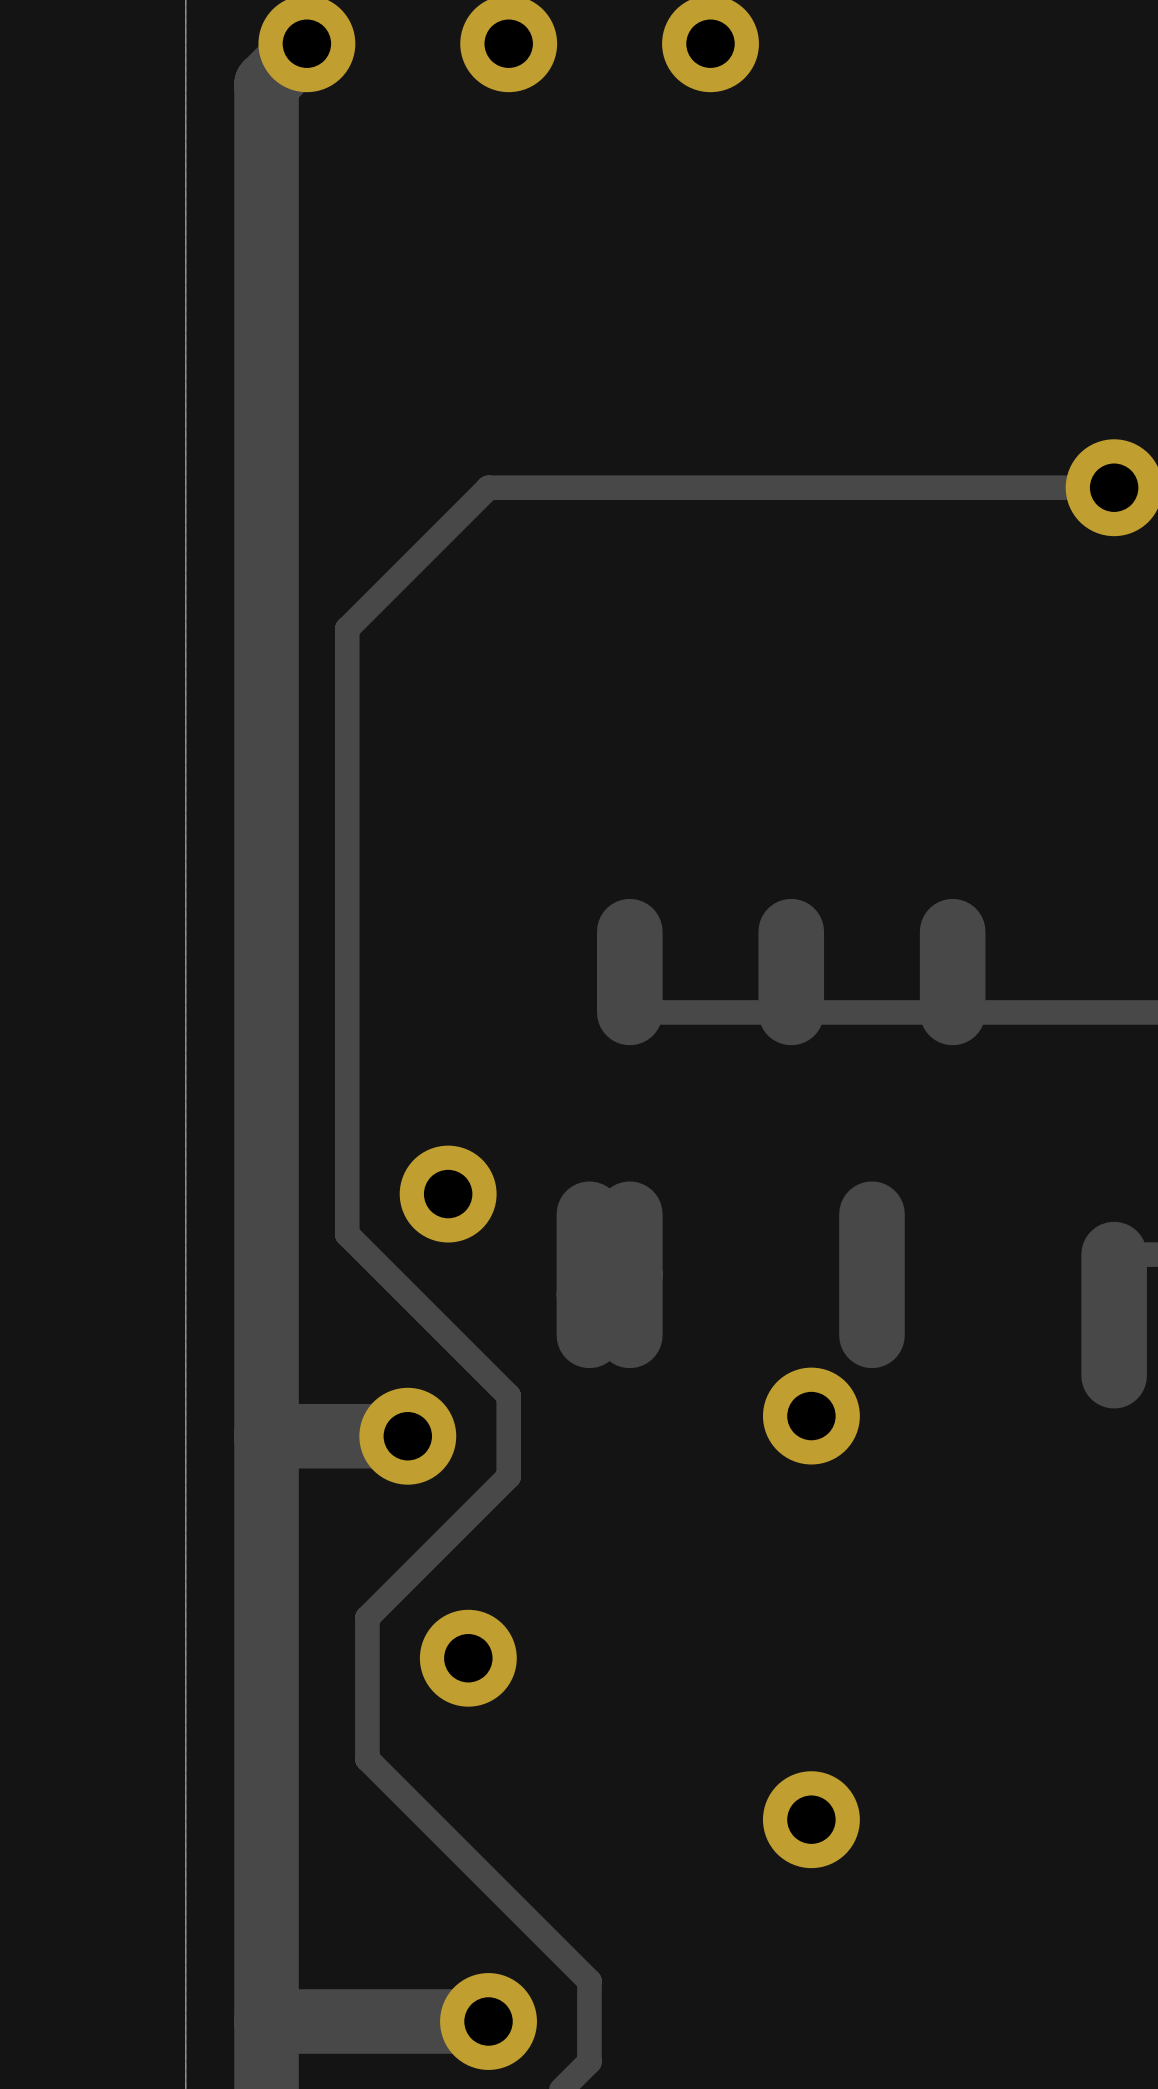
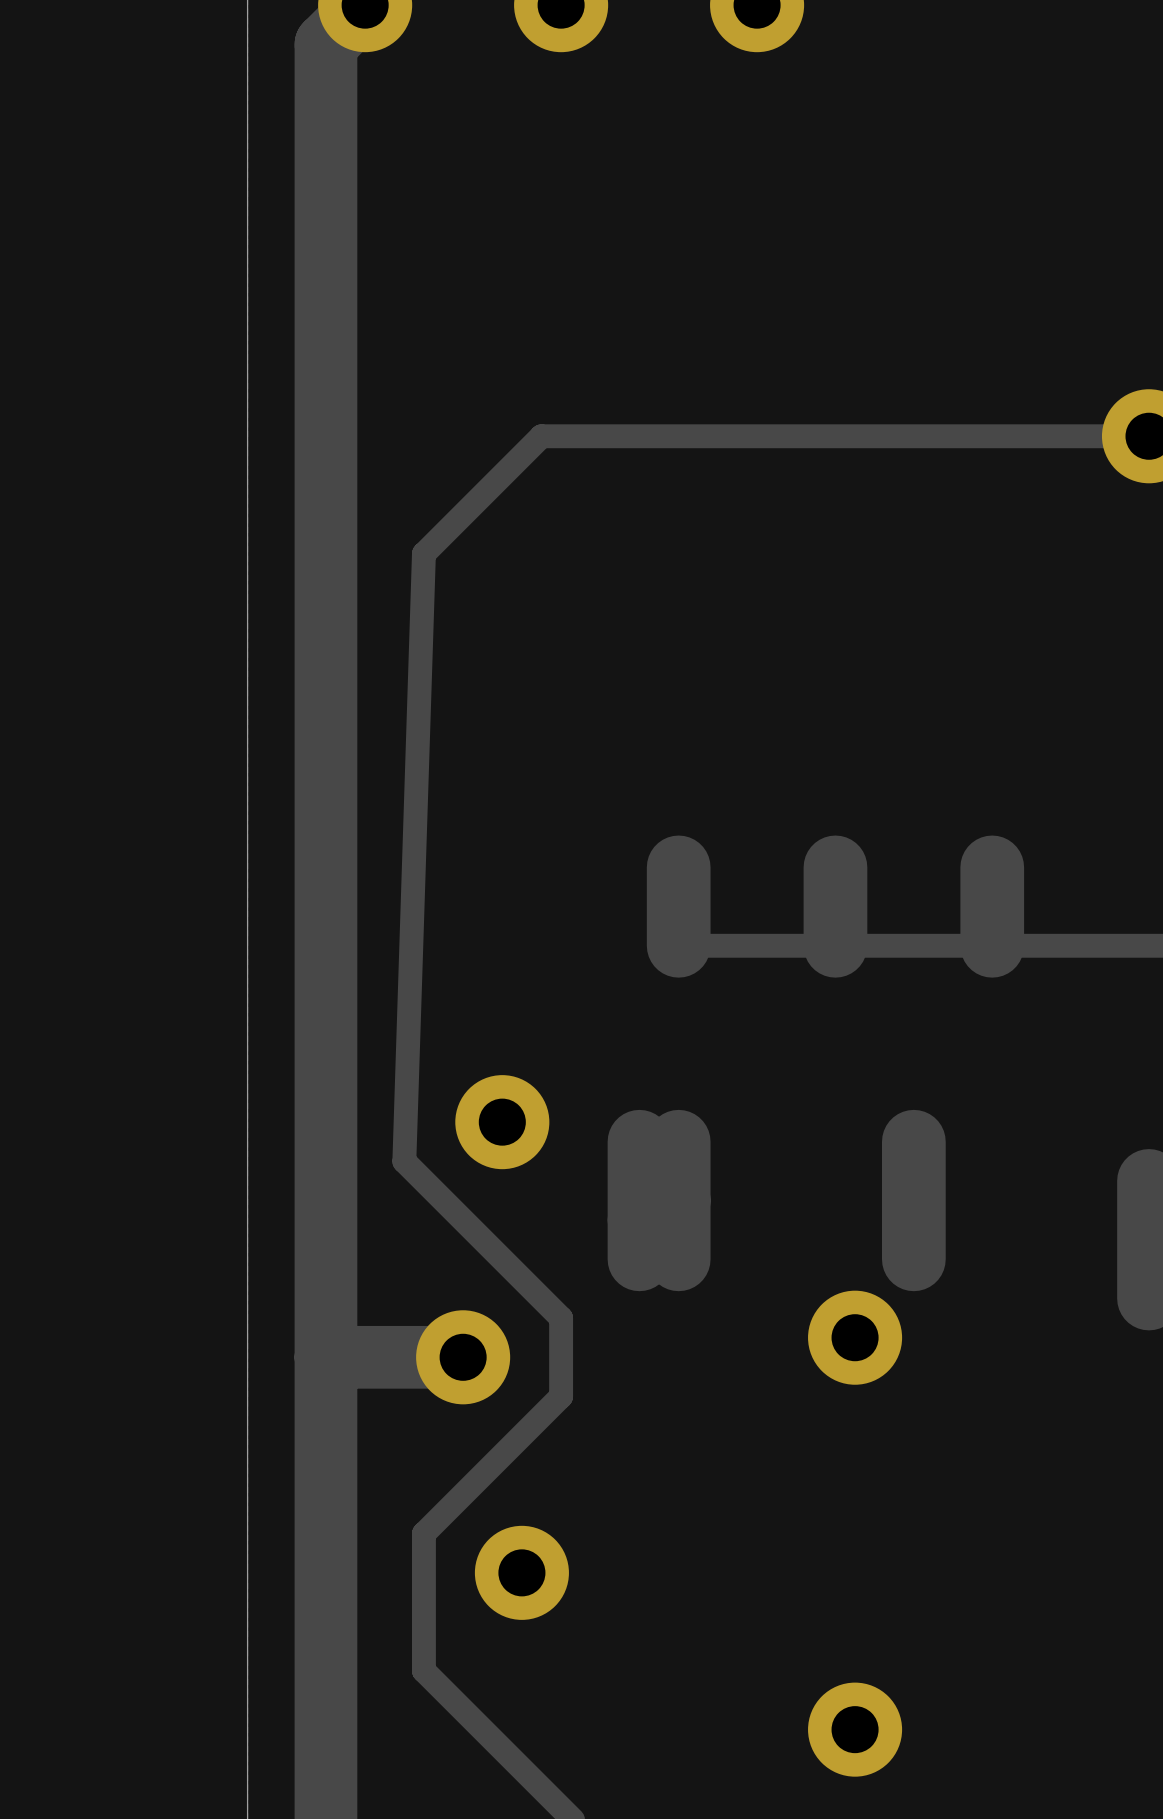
track: (367, 608) (347, 628) (347, 1234) -> (423, 553) (404, 1161)

